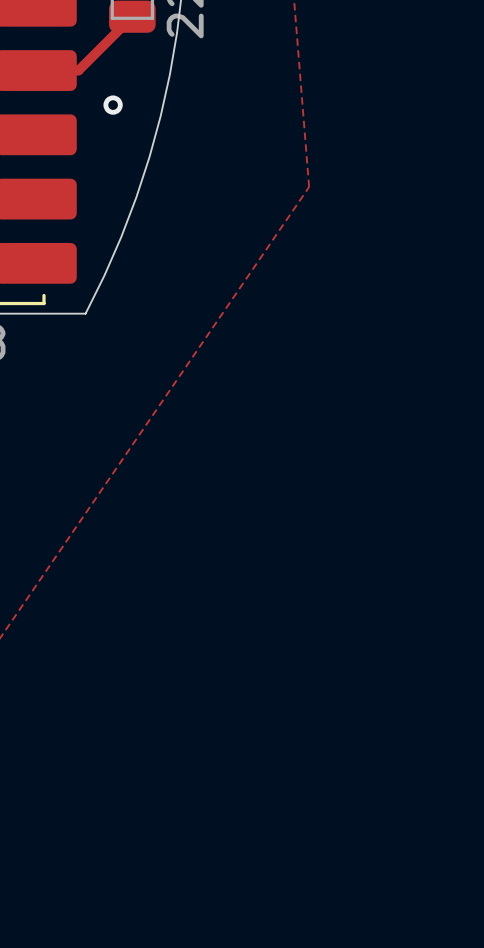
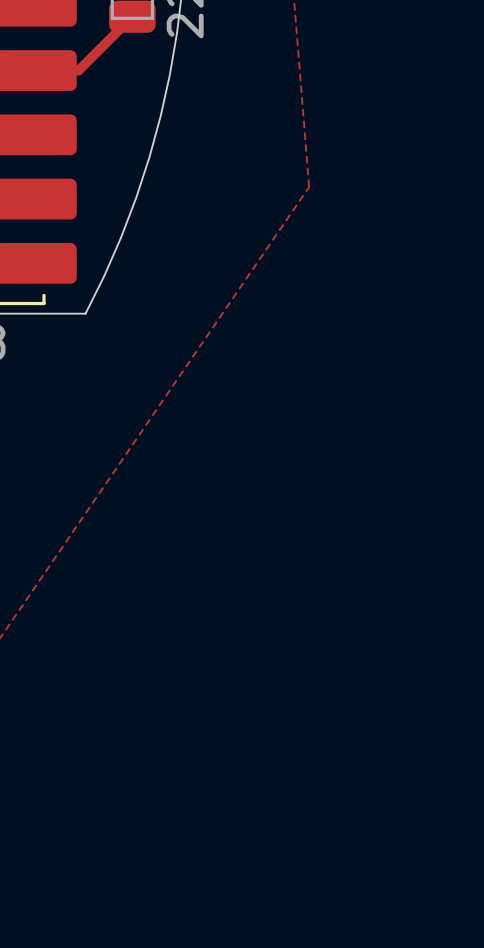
via: (113, 105) -> none

